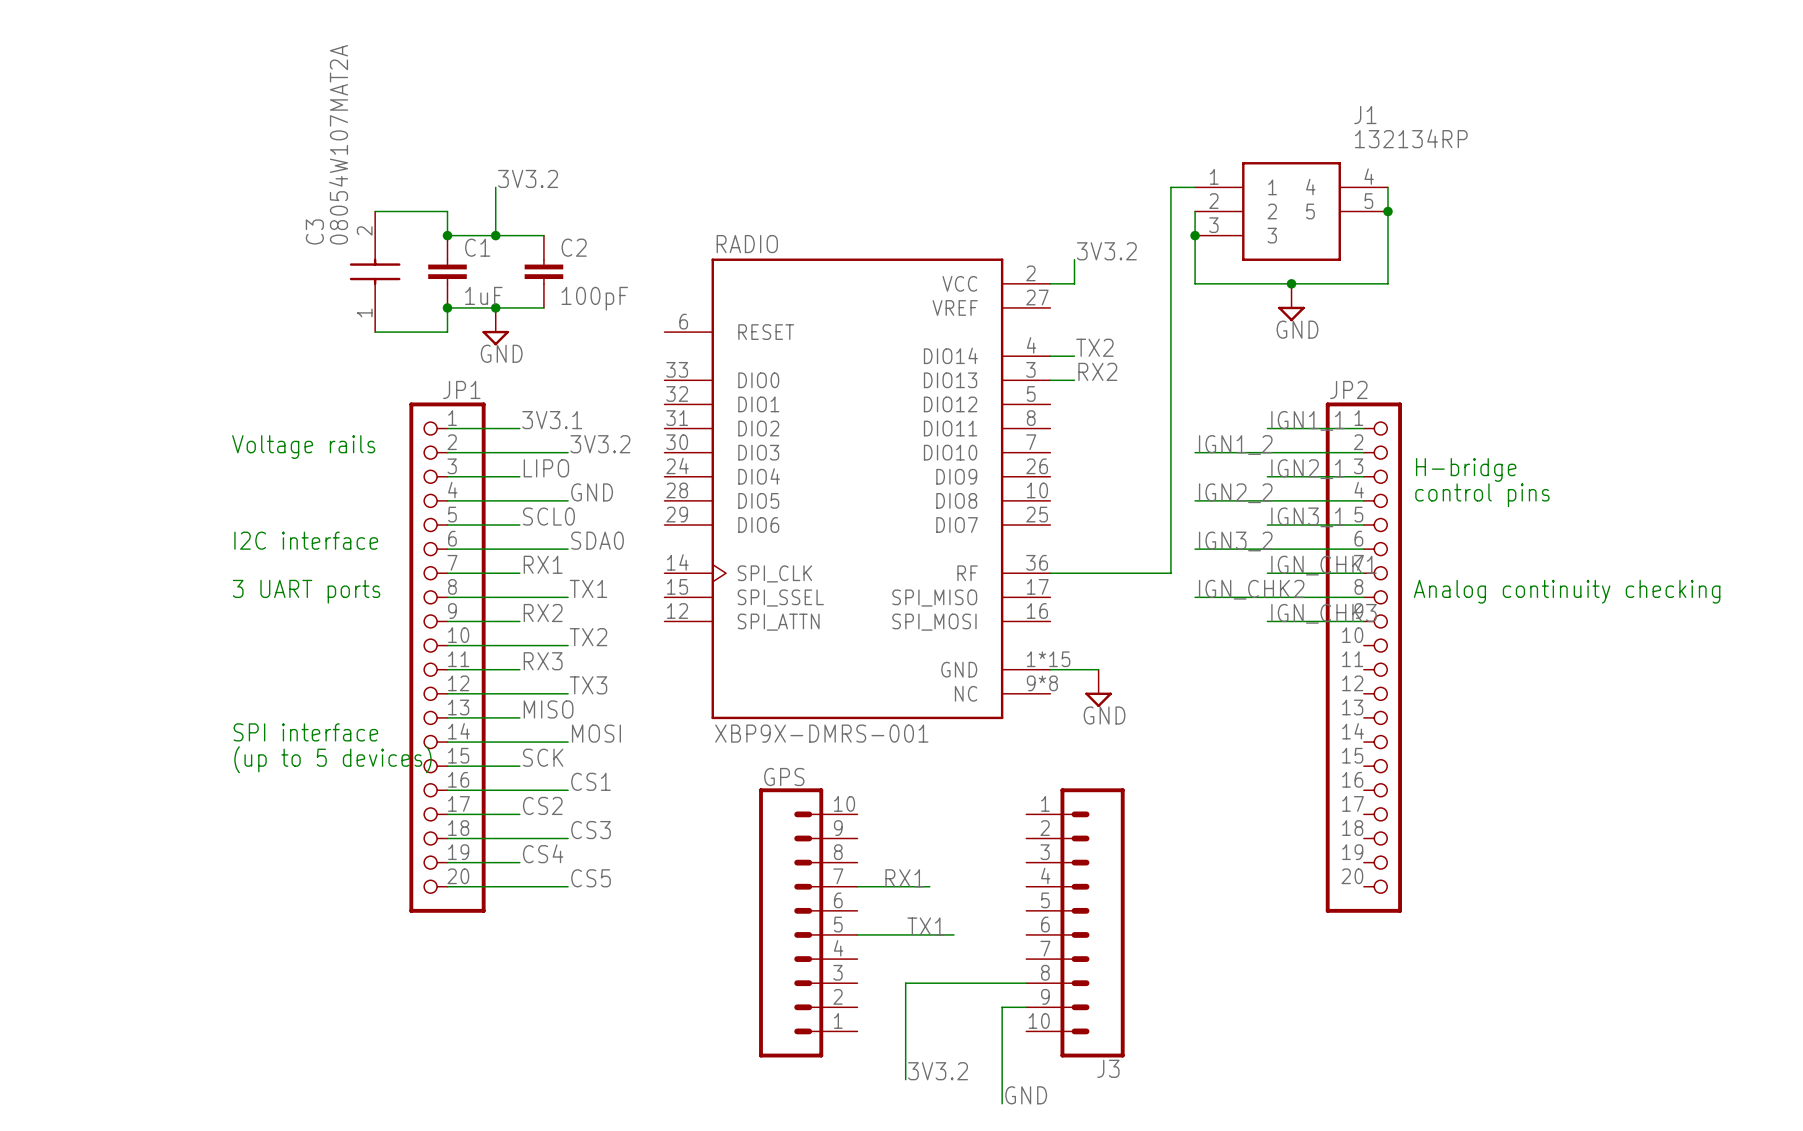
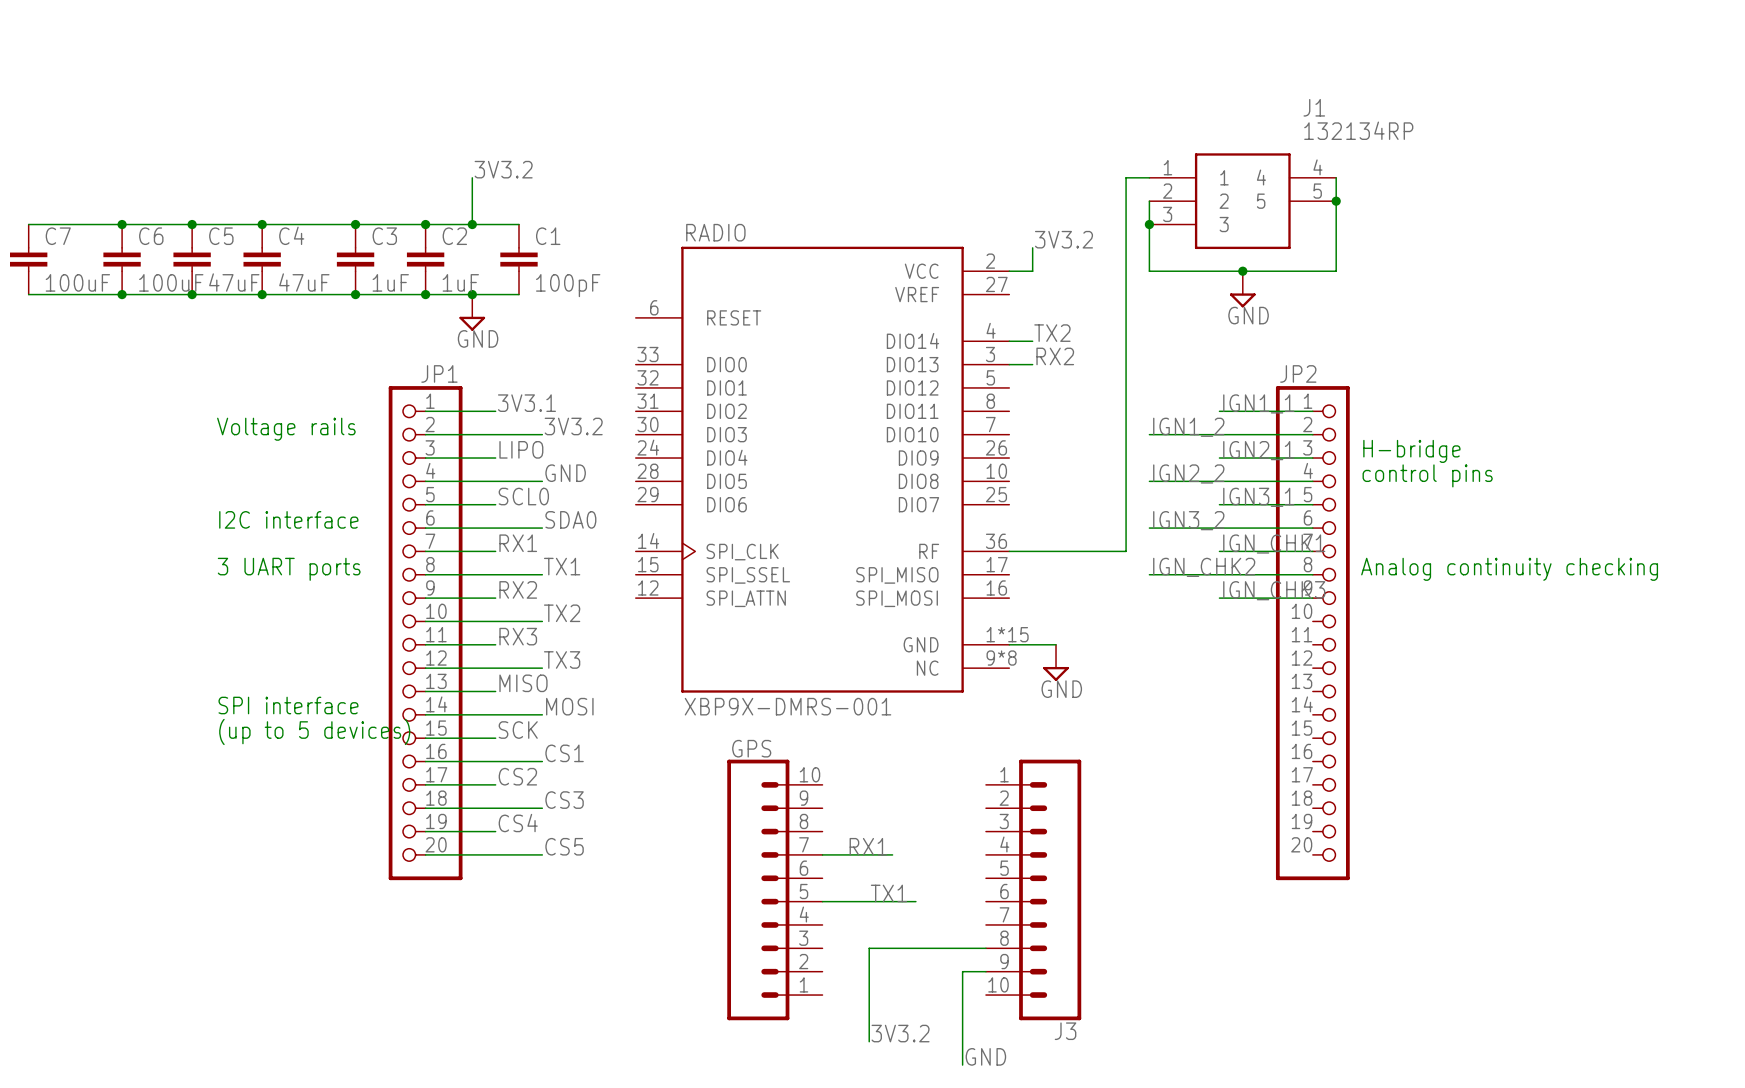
C3 value: 08054W107MAT2A (338, 144) -> 1uF (390, 282)
C3 symbol: [349, 211, 401, 333] -> [336, 224, 375, 295]
wire: (375, 211) (447, 211) (447, 235) -> (28, 224) (425, 224)
C3 name position: C3 (314, 231) -> C3 (384, 236)
junction: none -> (122, 224)
junction: none -> (192, 224)
junction: none -> (262, 224)
junction: none -> (355, 224)
C1 name: C1 (477, 247) -> C2 (454, 236)
C2 name: C2 (574, 247) -> C1 (548, 236)
C7: none -> 100uF (28, 259)
C6: none -> 100uF (122, 259)
C5: none -> 47uF (192, 259)
C4: none -> 47uF (262, 259)
junction: none -> (122, 294)
junction: none -> (192, 294)
junction: none -> (262, 294)
junction: none -> (355, 294)
wire: (447, 307) (447, 332) (375, 332) -> (425, 294) (28, 294)

